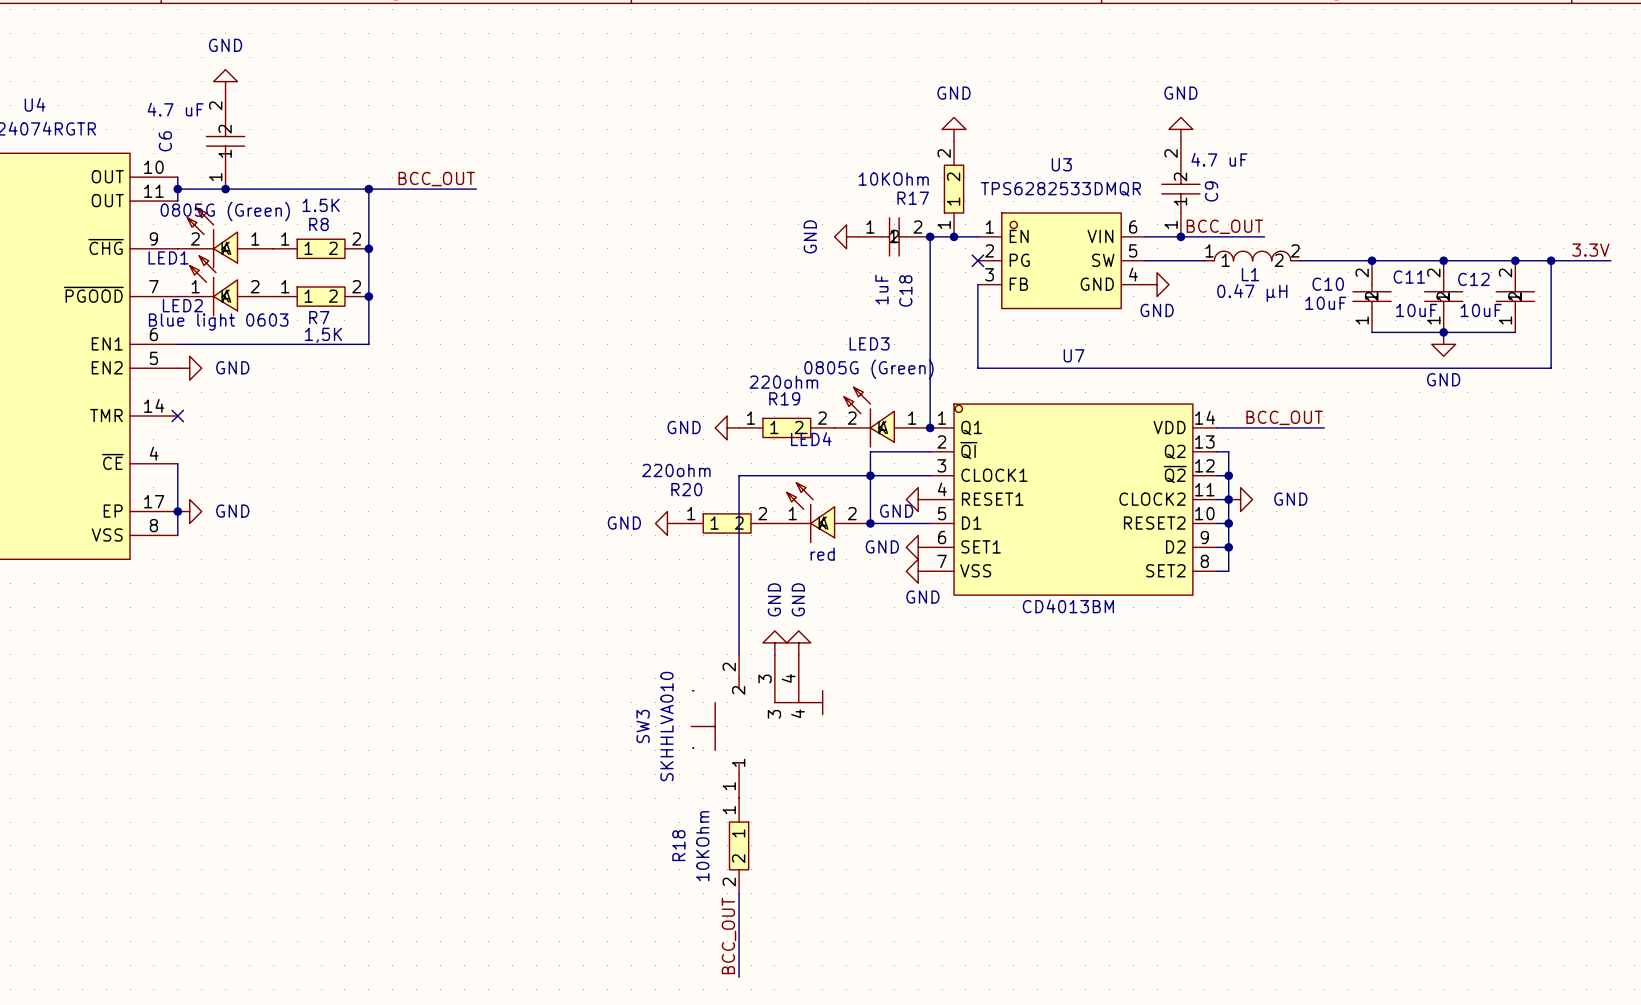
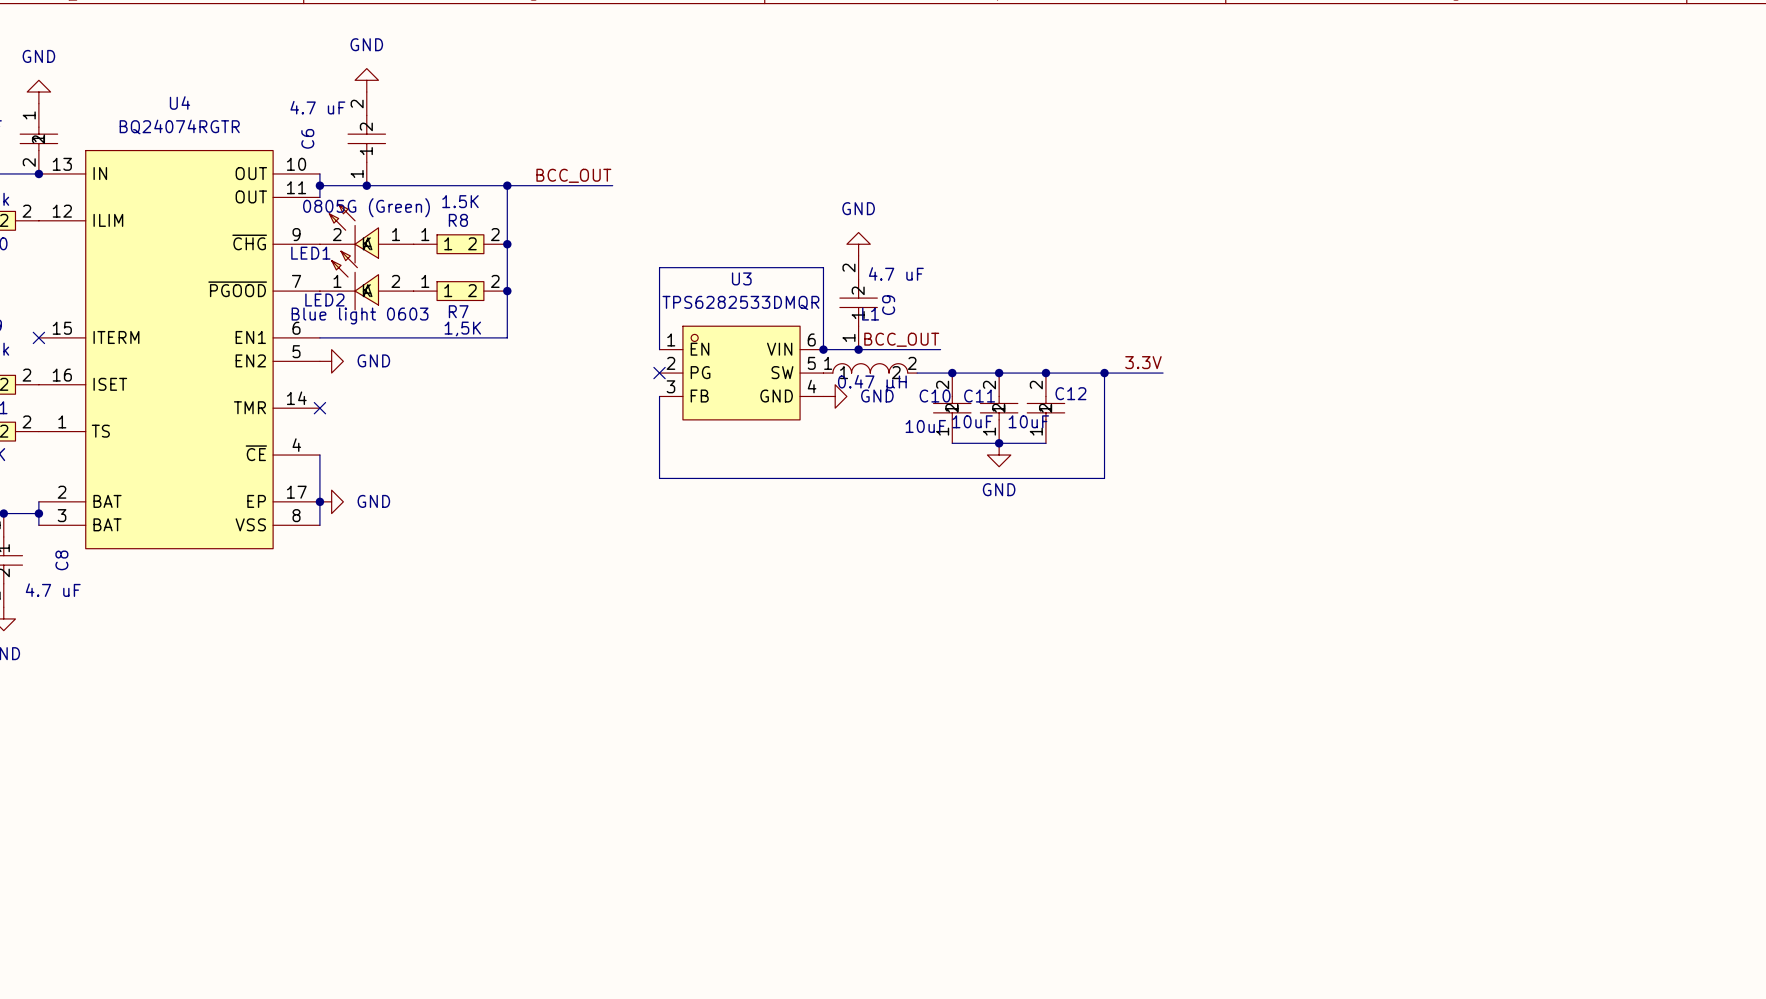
power symbol: GND (954, 129) -> none
power symbol: GND (1180, 129) -> none
R17: 10KOhm (954, 189) -> none
C9 position: (1180, 189) -> (858, 302)
label: BCC_OUT (1224, 226) -> none
power symbol: GND (846, 236) -> none
C18: 1uF (894, 236) -> none
junction: (930, 236) -> none
junction: (954, 236) -> none
wire: (977, 236) (930, 236) (930, 427) -> none
wire: (1145, 236) (1264, 236) -> none
junction: (1180, 236) -> none
power symbol: none -> GND (858, 244)
label: 3.3V (1590, 250) -> none
L1 position: (1252, 256) -> (870, 368)
no-connect mark: (977, 260) -> none
U3 position: (1061, 260) -> (741, 373)
wire: (1145, 260) (1204, 260) -> none
wire: (1300, 260) (1610, 260) -> none
junction: (1372, 260) -> none
junction: (1443, 260) -> none
junction: (1515, 260) -> none
wire: (1551, 260) (1551, 368) (977, 368) (977, 284) -> none
junction: (1551, 260) -> none
L1 name position: L1 (1250, 274) -> L1 (870, 314)
C11 name position: C11 (1409, 277) -> C11 (979, 396)
C12 name position: C12 (1473, 279) -> C12 (1070, 393)
power symbol: GND (1157, 284) -> none
C10 name position: C10 (1328, 284) -> C10 (935, 396)
L1 value position: 0.47 µH (1252, 293) -> 0.47 µH (872, 383)
C10 position: (1372, 296) -> (952, 408)
C11 position: (1443, 296) -> (999, 408)
C12 position: (1515, 296) -> (1045, 408)
C10 value position: 10uF (1325, 303) -> 10uF (925, 426)
C12 value position: 10uF (1481, 310) -> 10uF (1028, 421)
wire: (1372, 332) (1515, 332) -> none
junction: (1443, 332) -> none
power symbol: GND (1443, 344) -> none
label: none -> BCC_OUT (901, 339)
wire: none -> (659, 349) (659, 267) (823, 267) (823, 349) (940, 349)
junction: none -> (823, 349)
junction: none -> (858, 349)
label: none -> 3.3V (1143, 362)
no-connect mark: none -> (659, 373)
wire: none -> (917, 373) (1163, 373)
junction: none -> (952, 373)
junction: none -> (999, 373)
junction: none -> (1045, 373)
wire: none -> (1104, 373) (1104, 478) (659, 478) (659, 396)
junction: none -> (1104, 373)
LED3: 0805G (Green) (882, 417) -> none
label: BCC_OUT (1284, 417) -> none
power symbol rotation: 0° (727, 427) -> 180° (835, 396)
power symbol position: GND (727, 427) -> GND (835, 396)
R19: 220ohm (786, 427) -> none
junction: (930, 427) -> none
wire: (1216, 427) (1324, 427) -> none
wire: (870, 451) (870, 523) (930, 523) -> (999, 443) (952, 443)
wire: (918, 451) (930, 451) -> none
wire: (1216, 451) (1228, 451) (1228, 571) (1216, 571) -> none
power symbol: none -> GND (999, 455)
junction position: (870, 475) -> (999, 443)
wire: (930, 475) (739, 475) (739, 654) -> none
wire: (1216, 475) (1228, 475) -> none
junction: (1228, 475) -> none
power symbol: GND (918, 499) -> none
U7: CD4013BM (1073, 499) -> none
wire: (1216, 499) (1228, 499) -> none
junction: (1228, 499) -> none
power symbol: GND (1240, 499) -> none
LED4: red (822, 512) -> none
power symbol: GND (667, 523) -> none
R20: 220ohm (727, 523) -> none
junction: (870, 523) -> none
wire: (1216, 523) (1228, 523) -> none
junction: (1228, 523) -> none
power symbol: GND (918, 547) -> none
wire: (1216, 547) (1228, 547) -> none
junction: (1228, 547) -> none
power symbol: GND (918, 571) -> none
power symbol: GND (774, 642) -> none
power symbol: GND (798, 642) -> none
SW3: SKHHLVA010 (756, 726) -> none
R18: 10KOhm (739, 845) -> none
wire: (739, 893) (739, 977) -> none
label: BCC_OUT (728, 935) -> none

